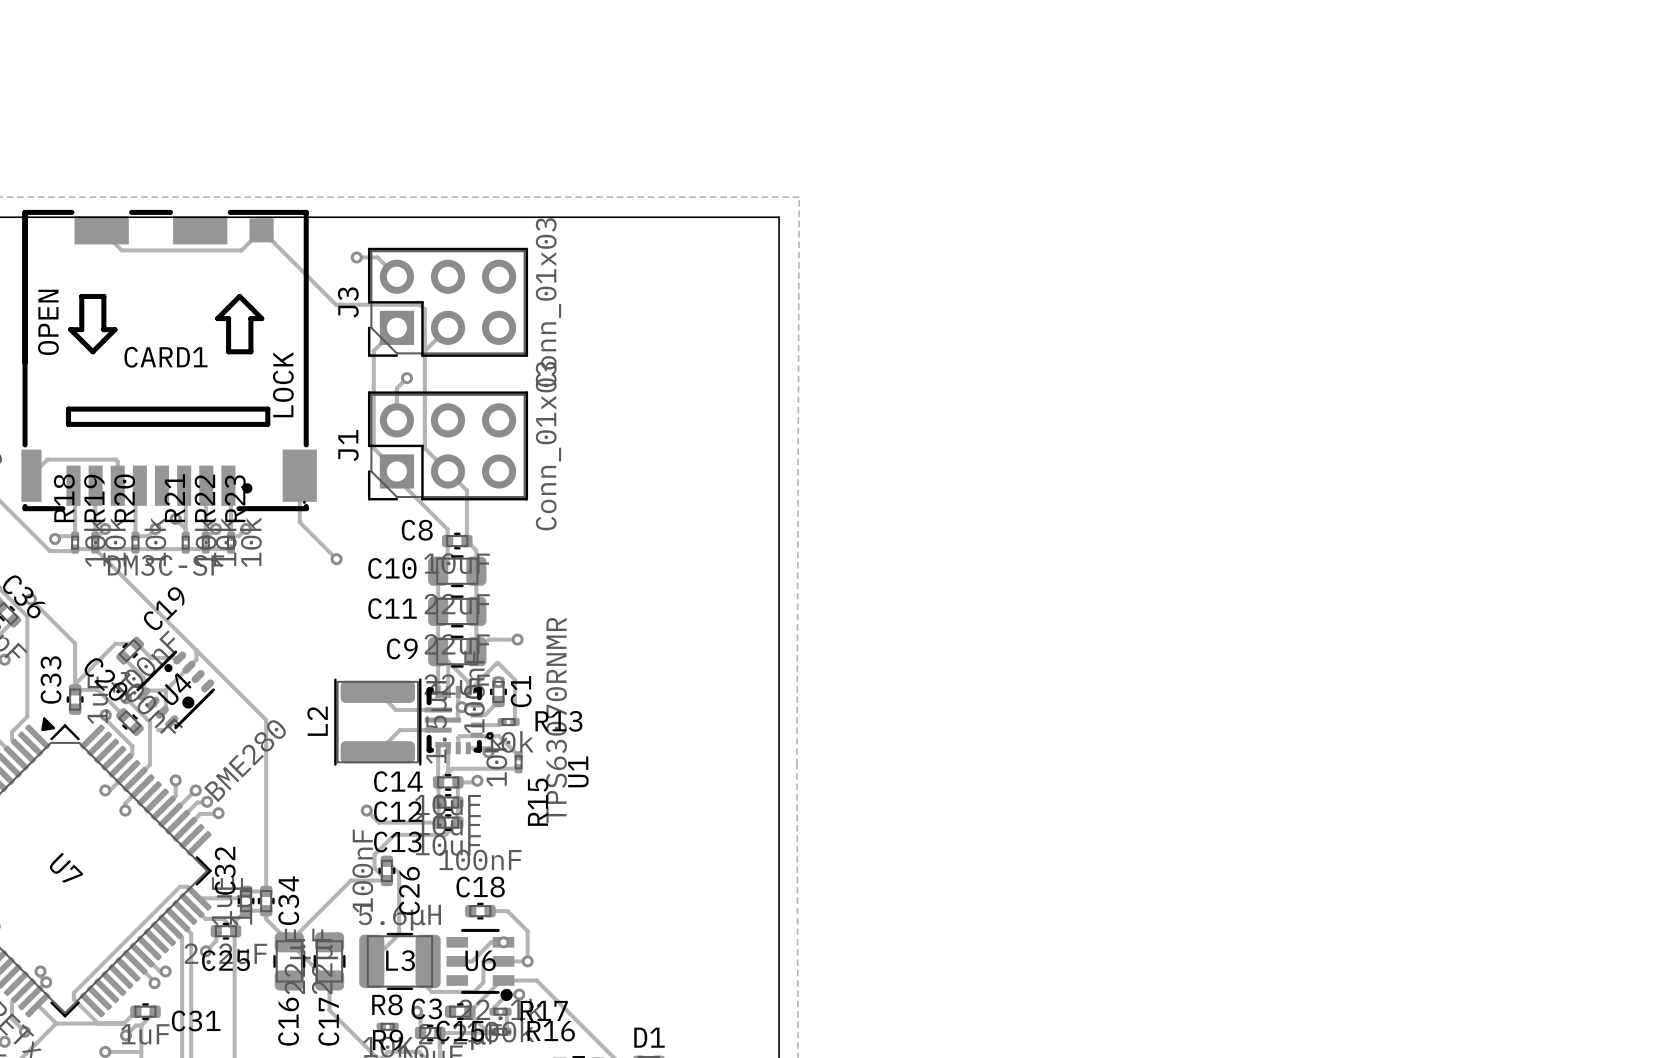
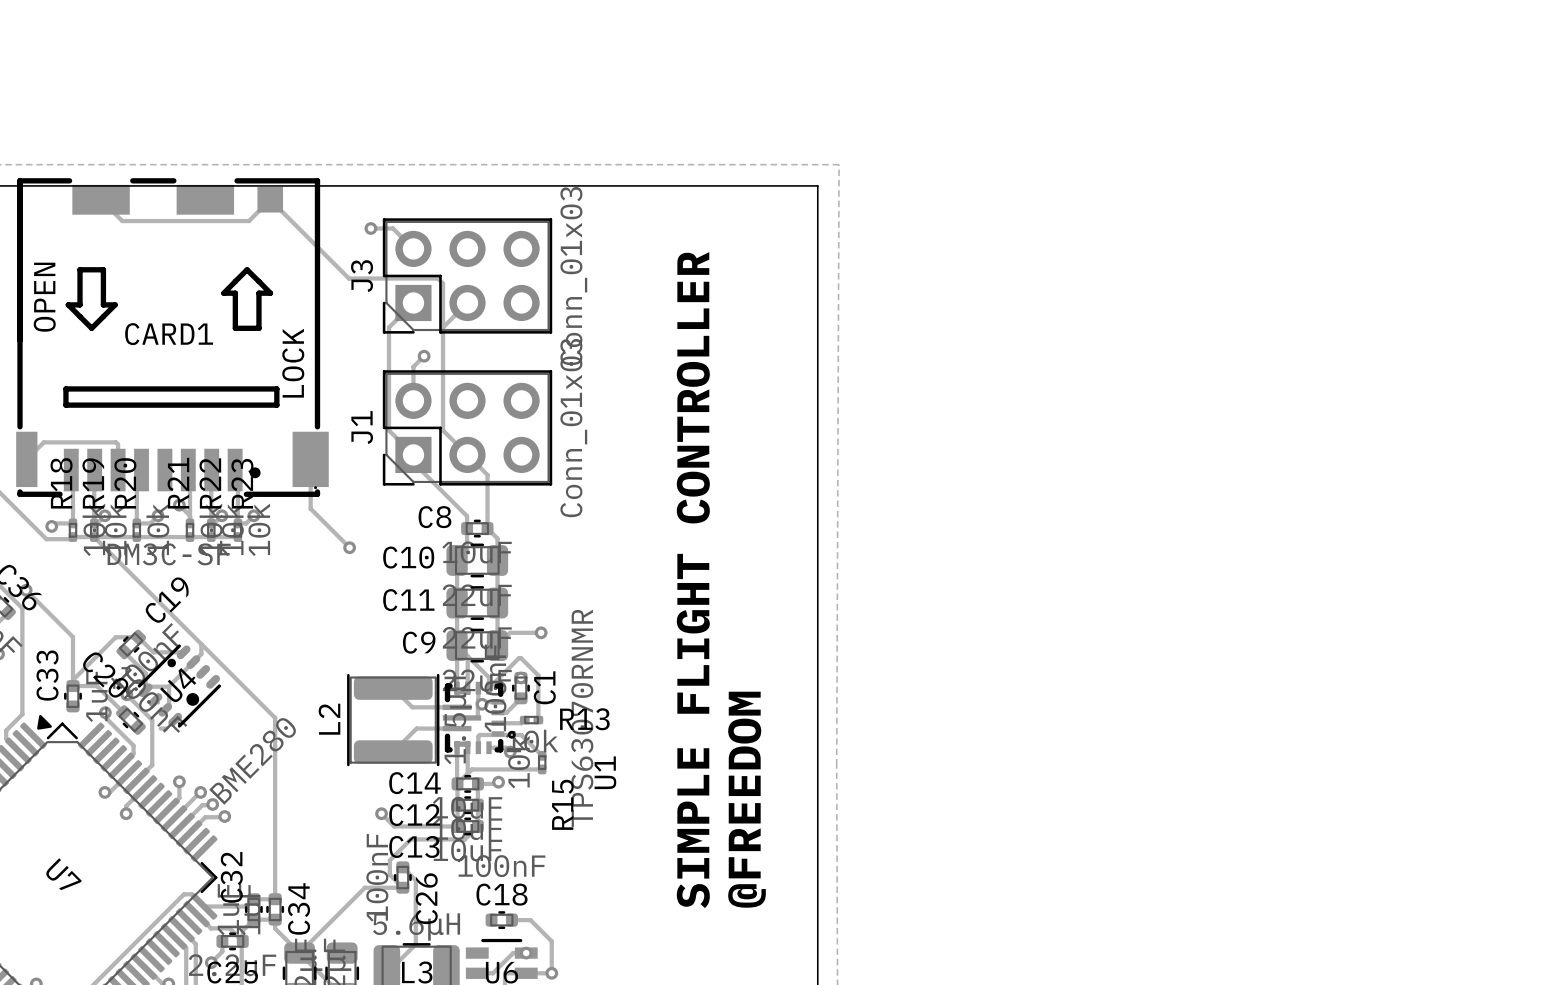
text: none -> SIMPLE FLIGHT CONTROLLER (693, 580)
text: none -> @FREEDOM (747, 799)

